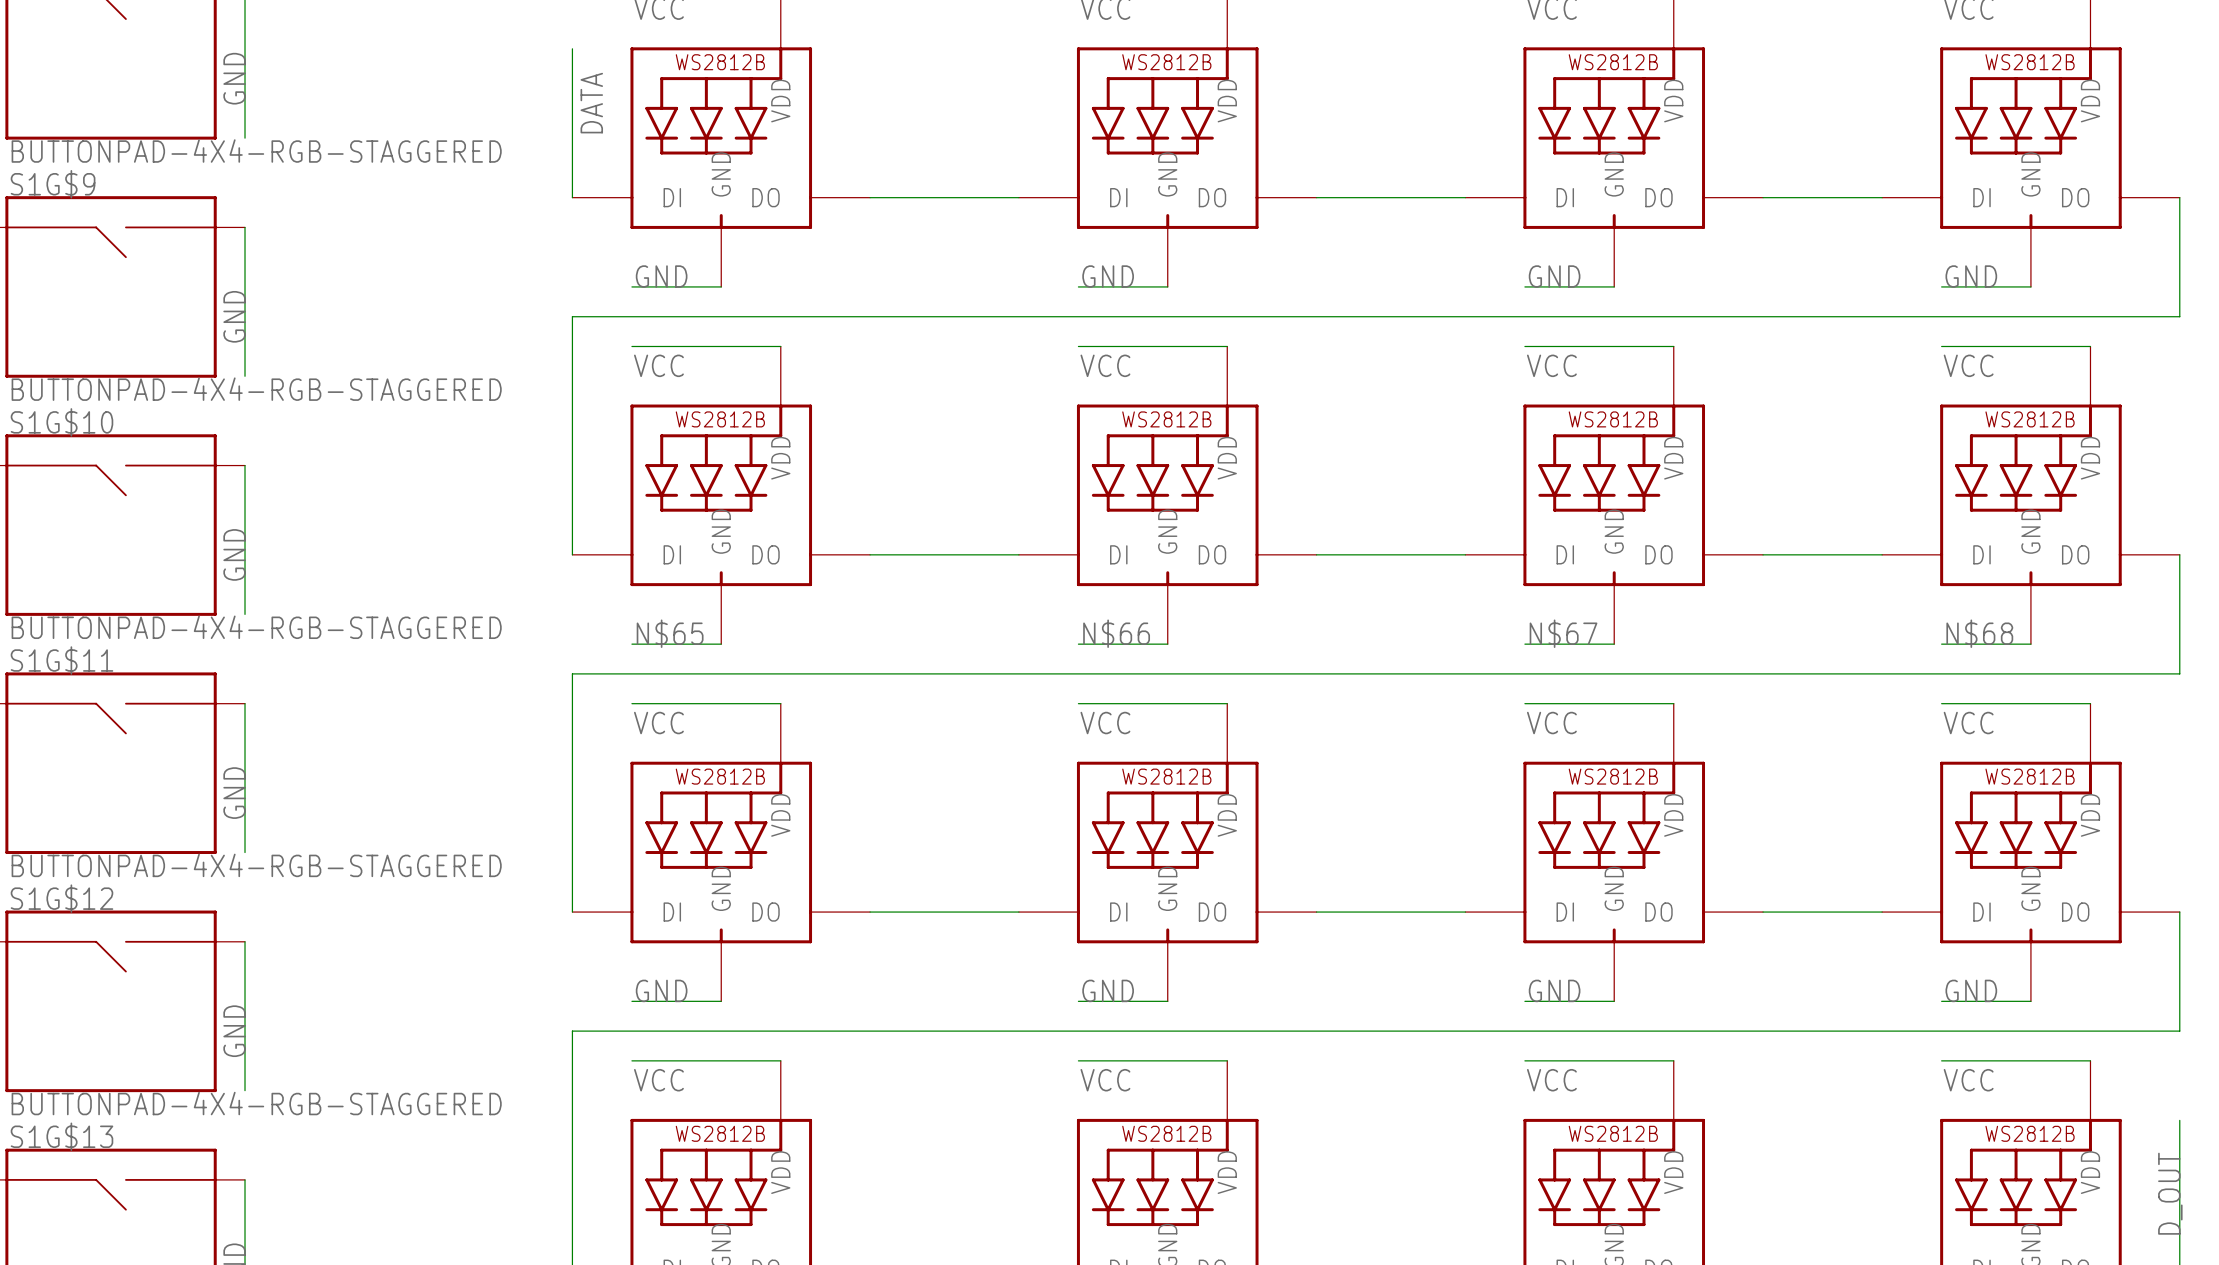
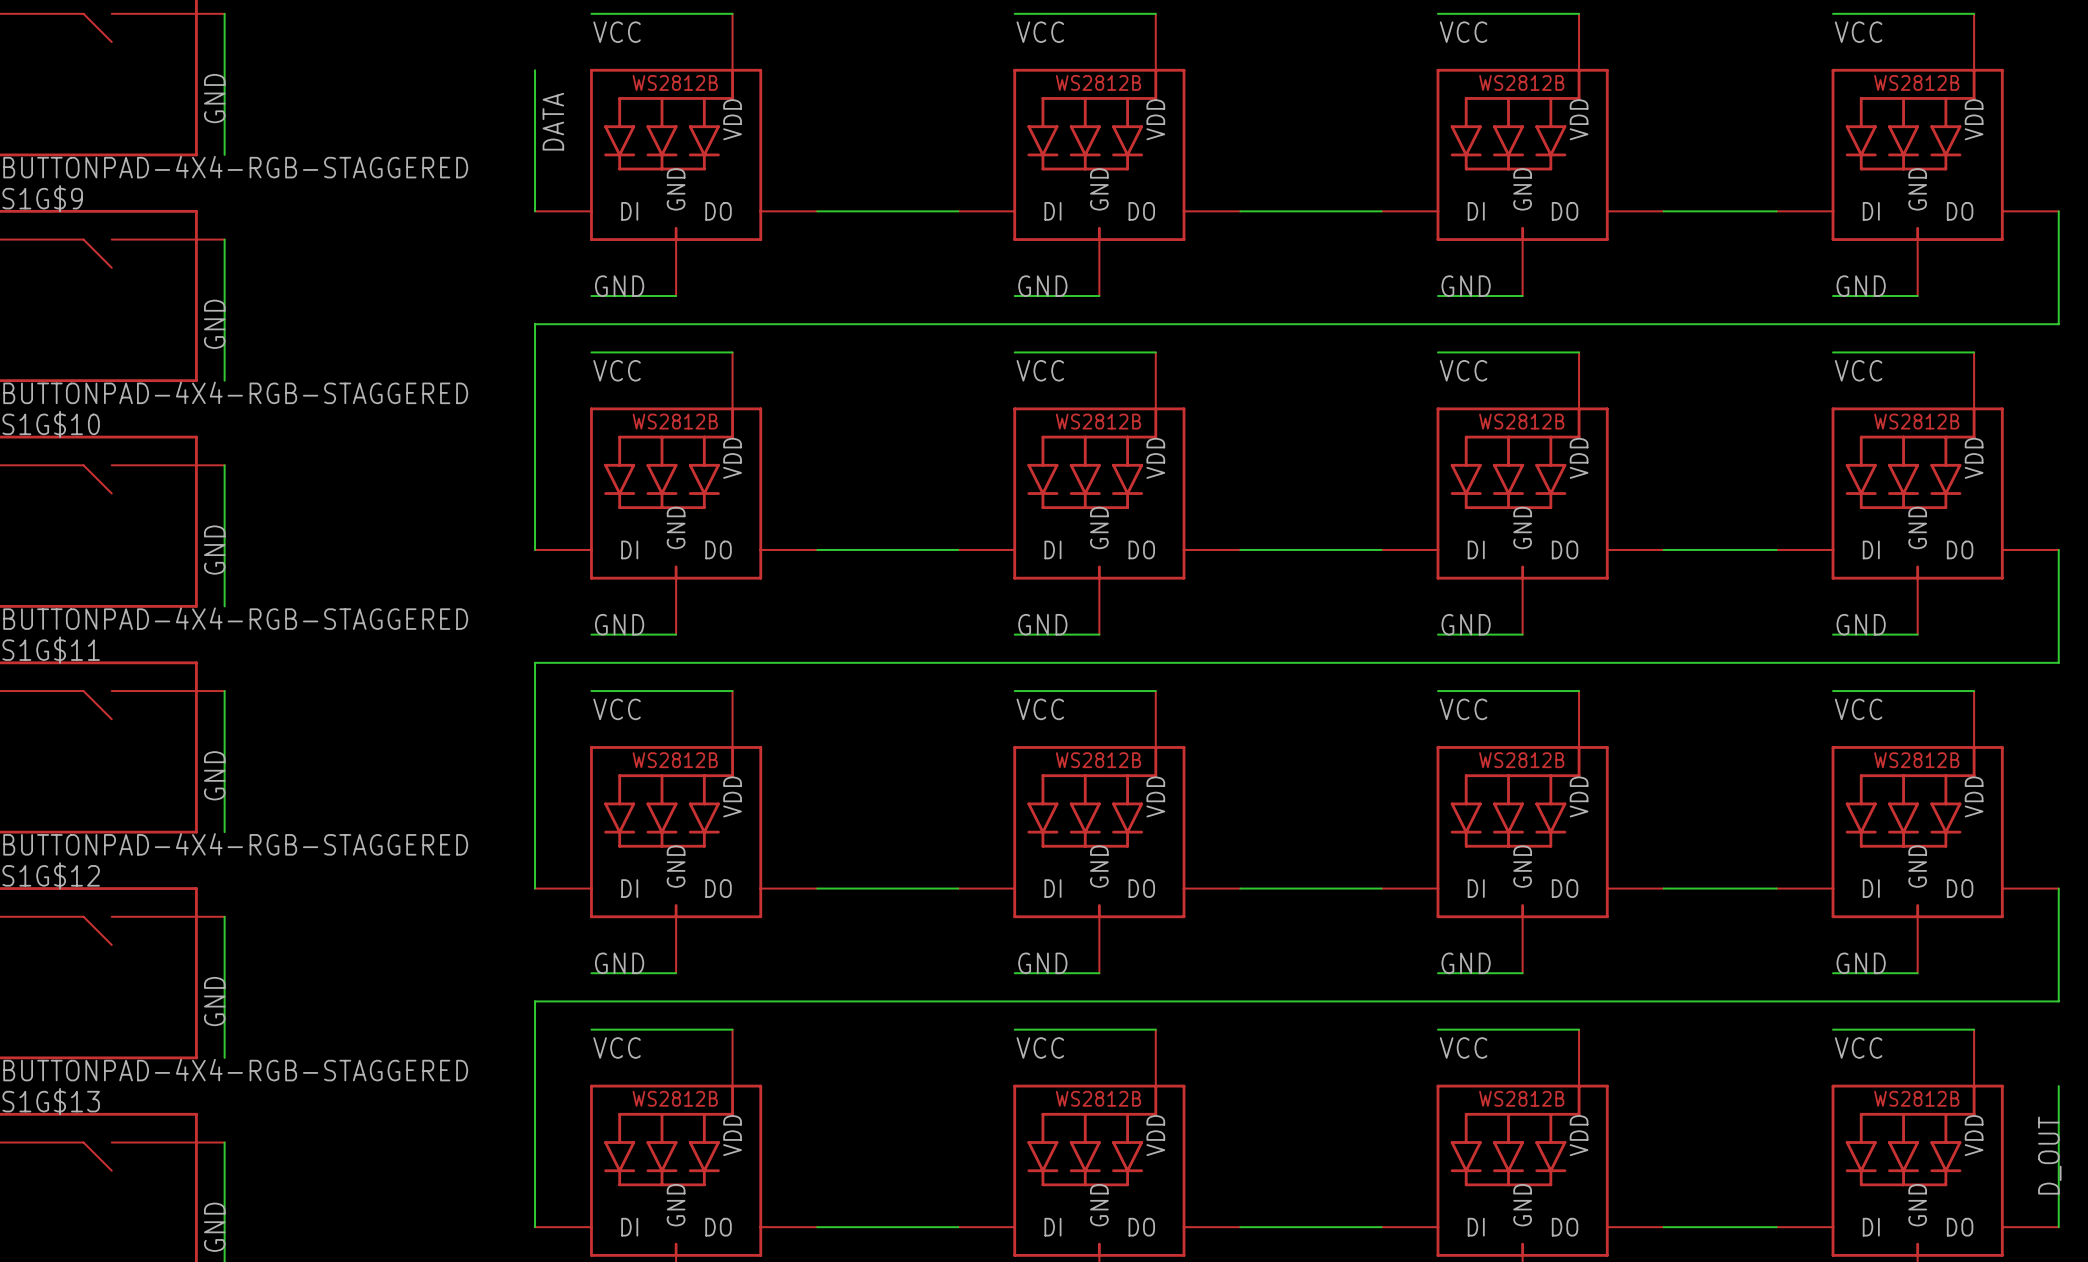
label: N$65 (670, 633) -> GND (619, 624)
label: N$66 (1116, 633) -> GND (1042, 624)
label: N$67 (1563, 633) -> GND (1466, 624)
label: N$68 (1979, 633) -> GND (1861, 624)

